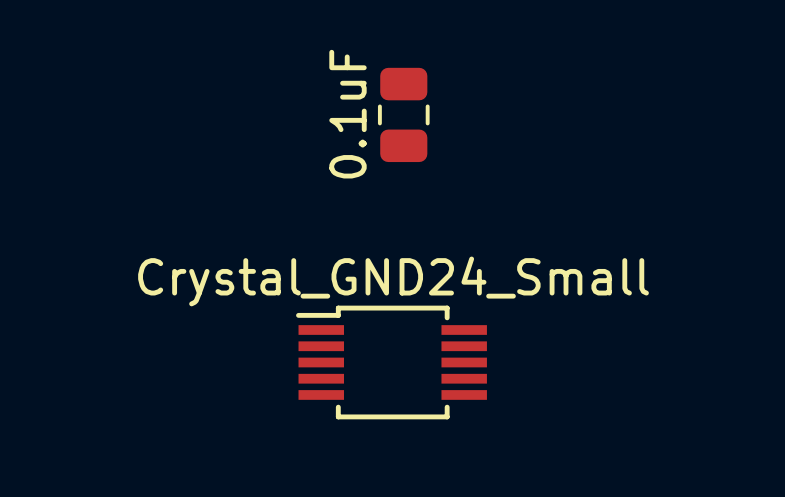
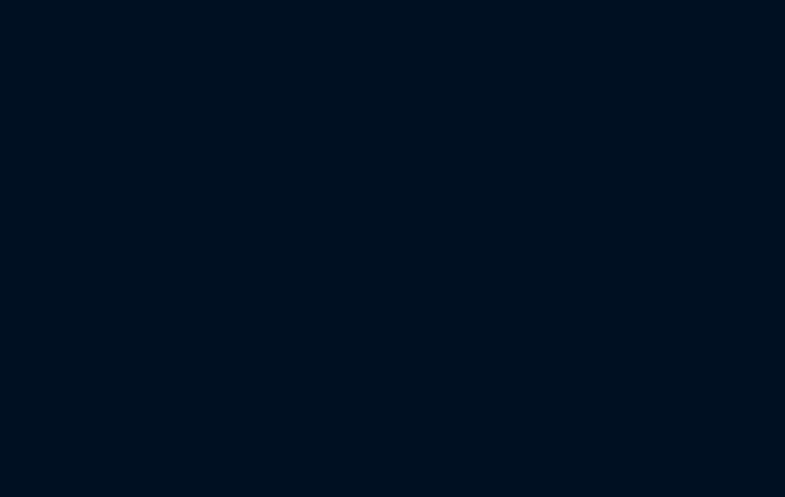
0.1uF: (403, 114) -> none
Crystal_GND24_Small: (391, 362) -> none

